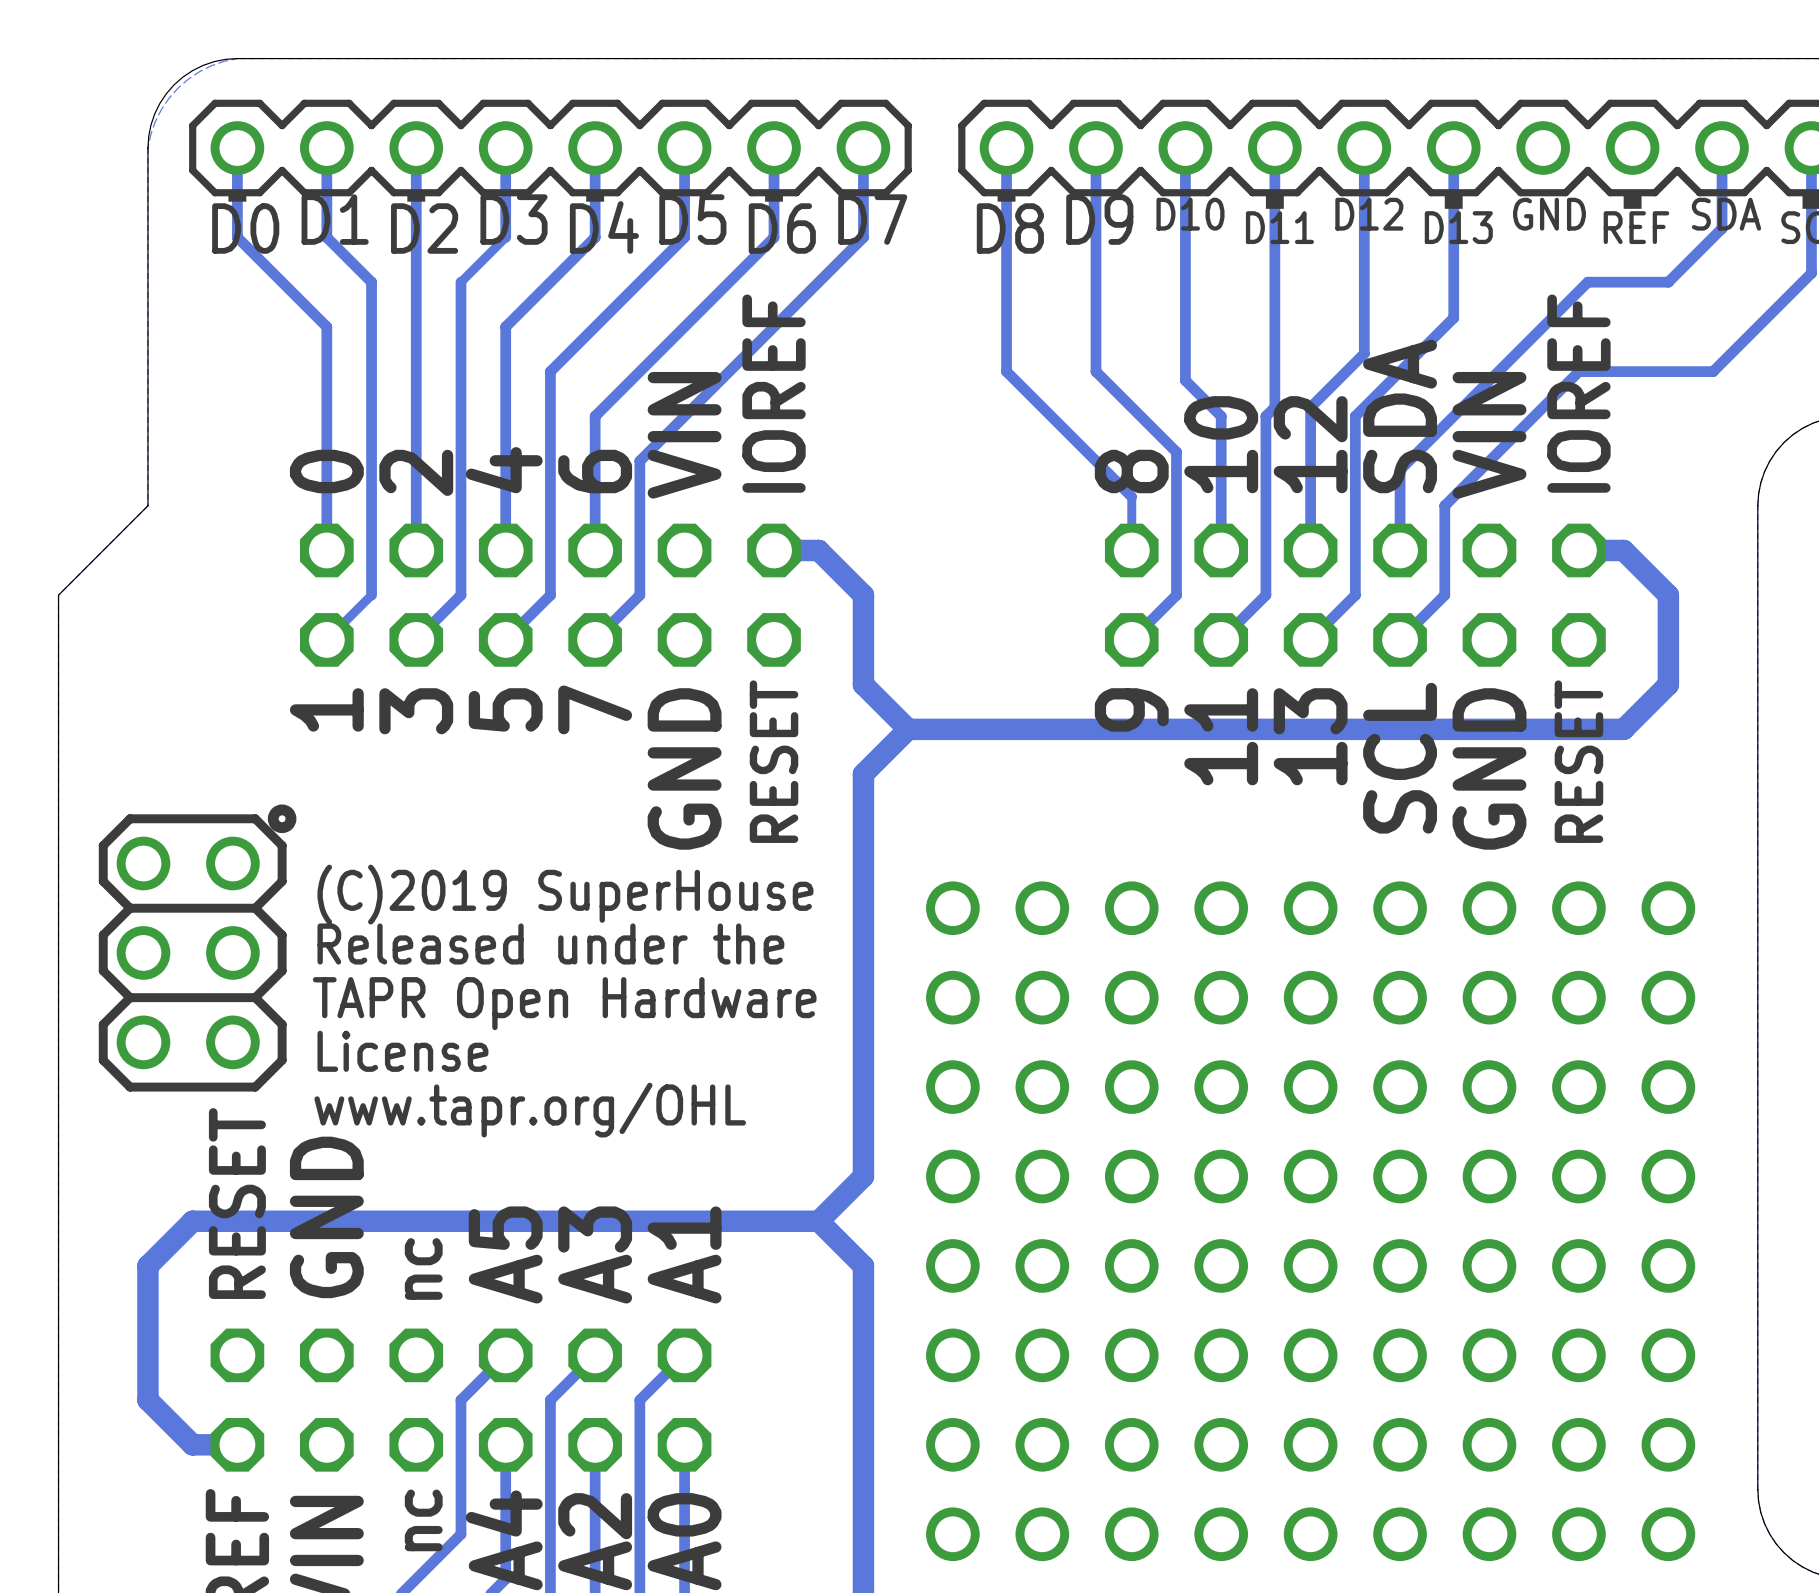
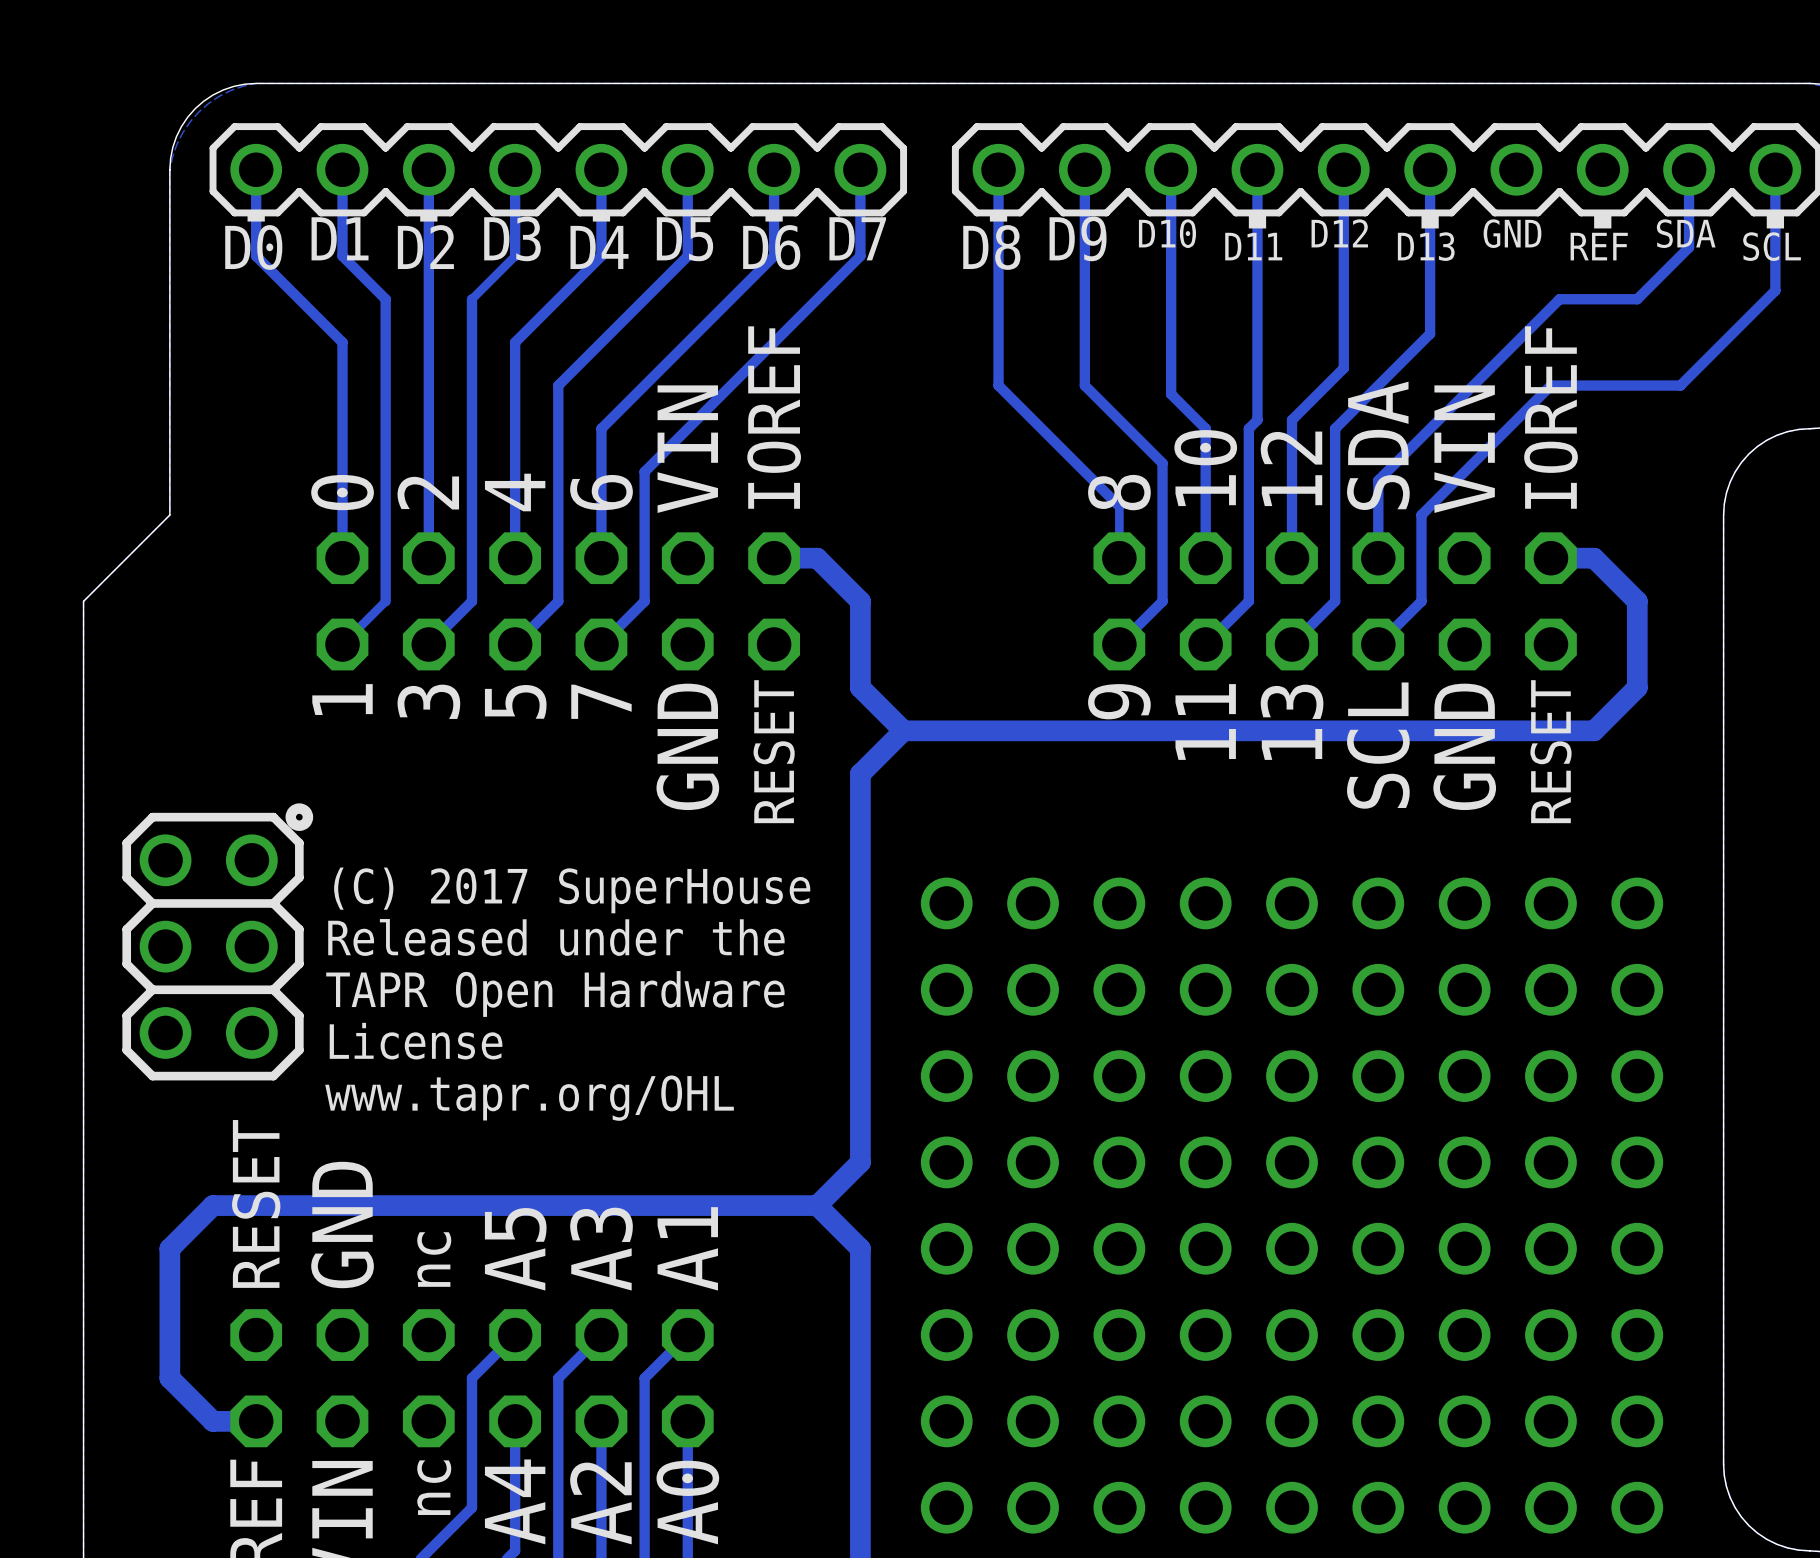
text: (C)2019 SuperHouse (565, 894) -> (C) 2017 SuperHouse (572, 890)

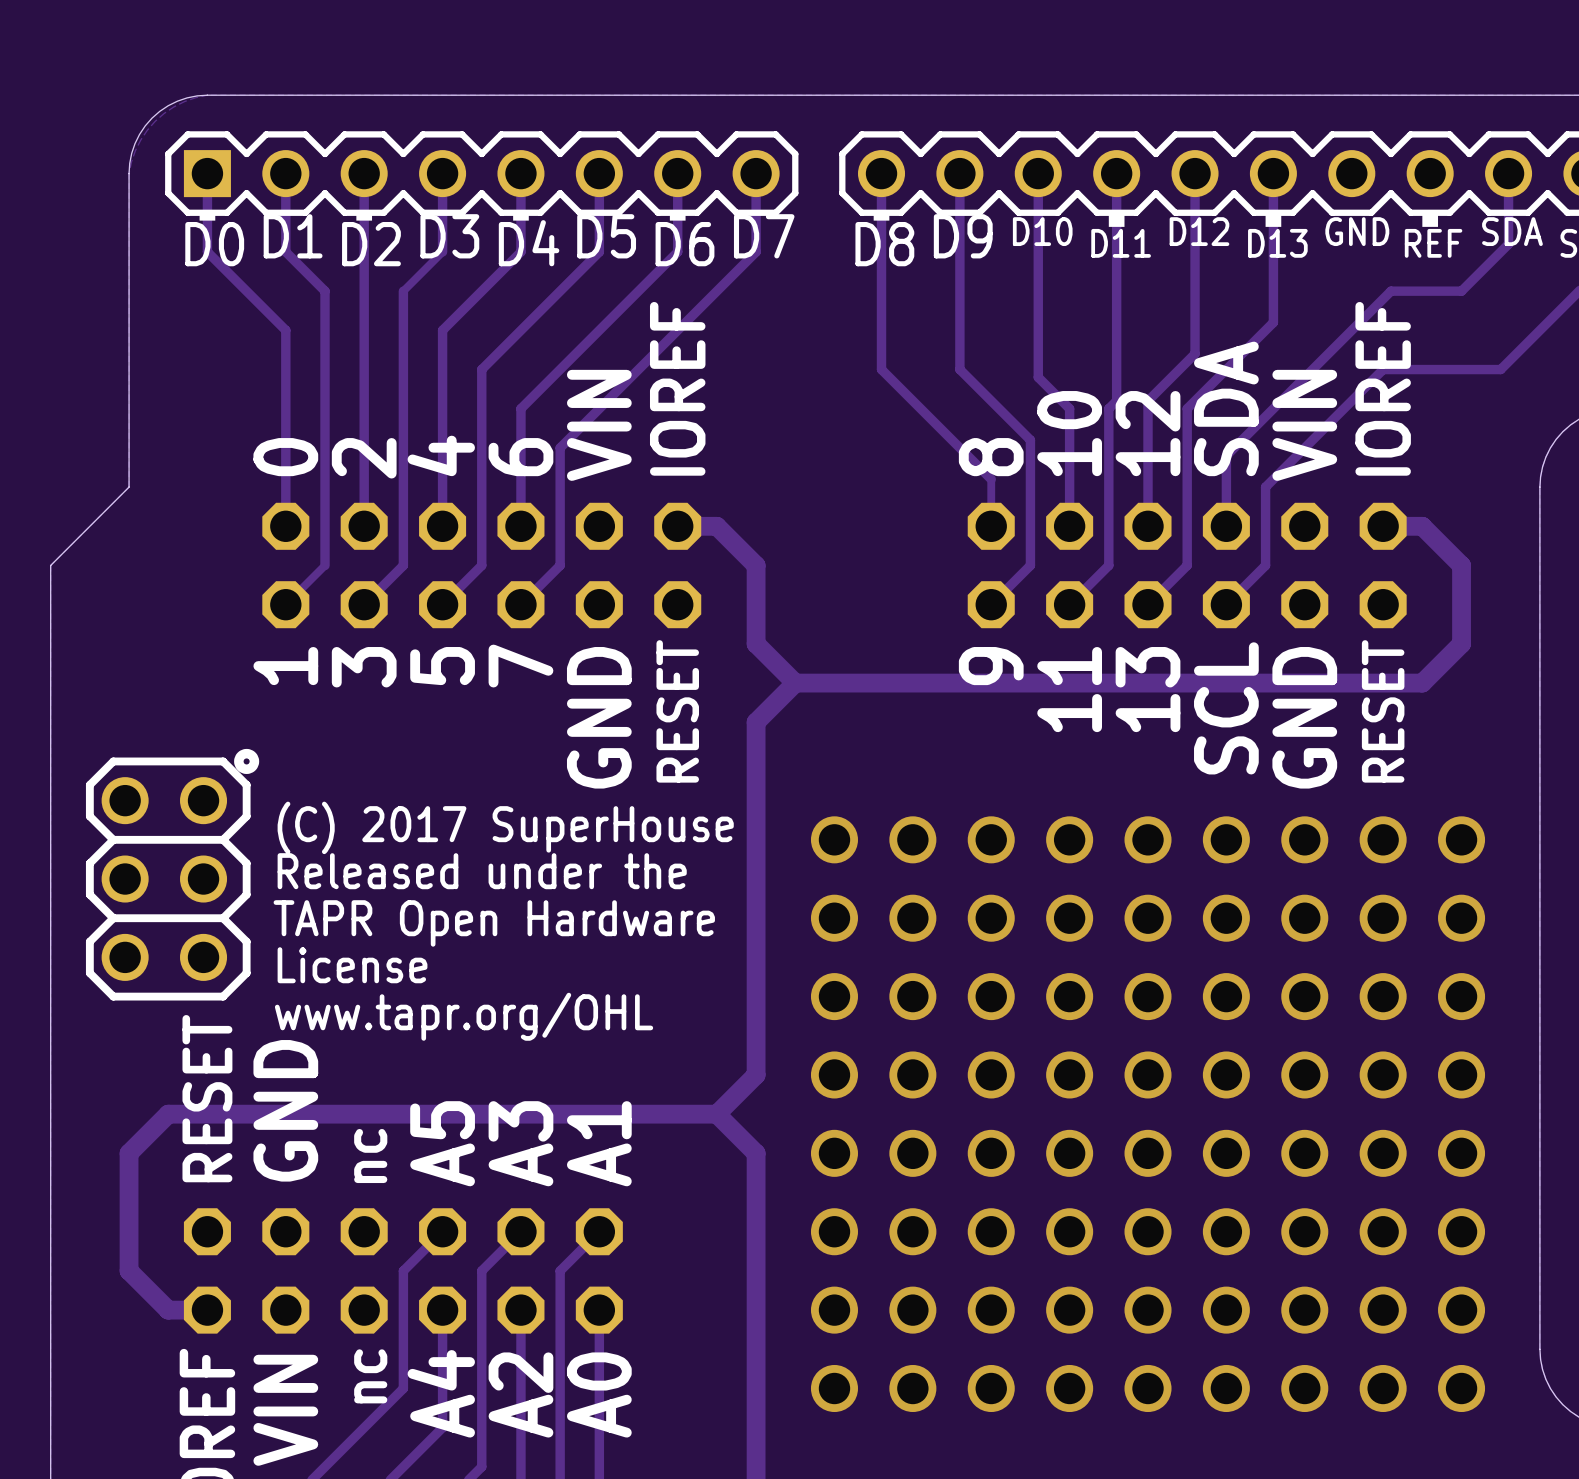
part footprint: [230, 143, 887, 196] -> [183, 150, 780, 198]

